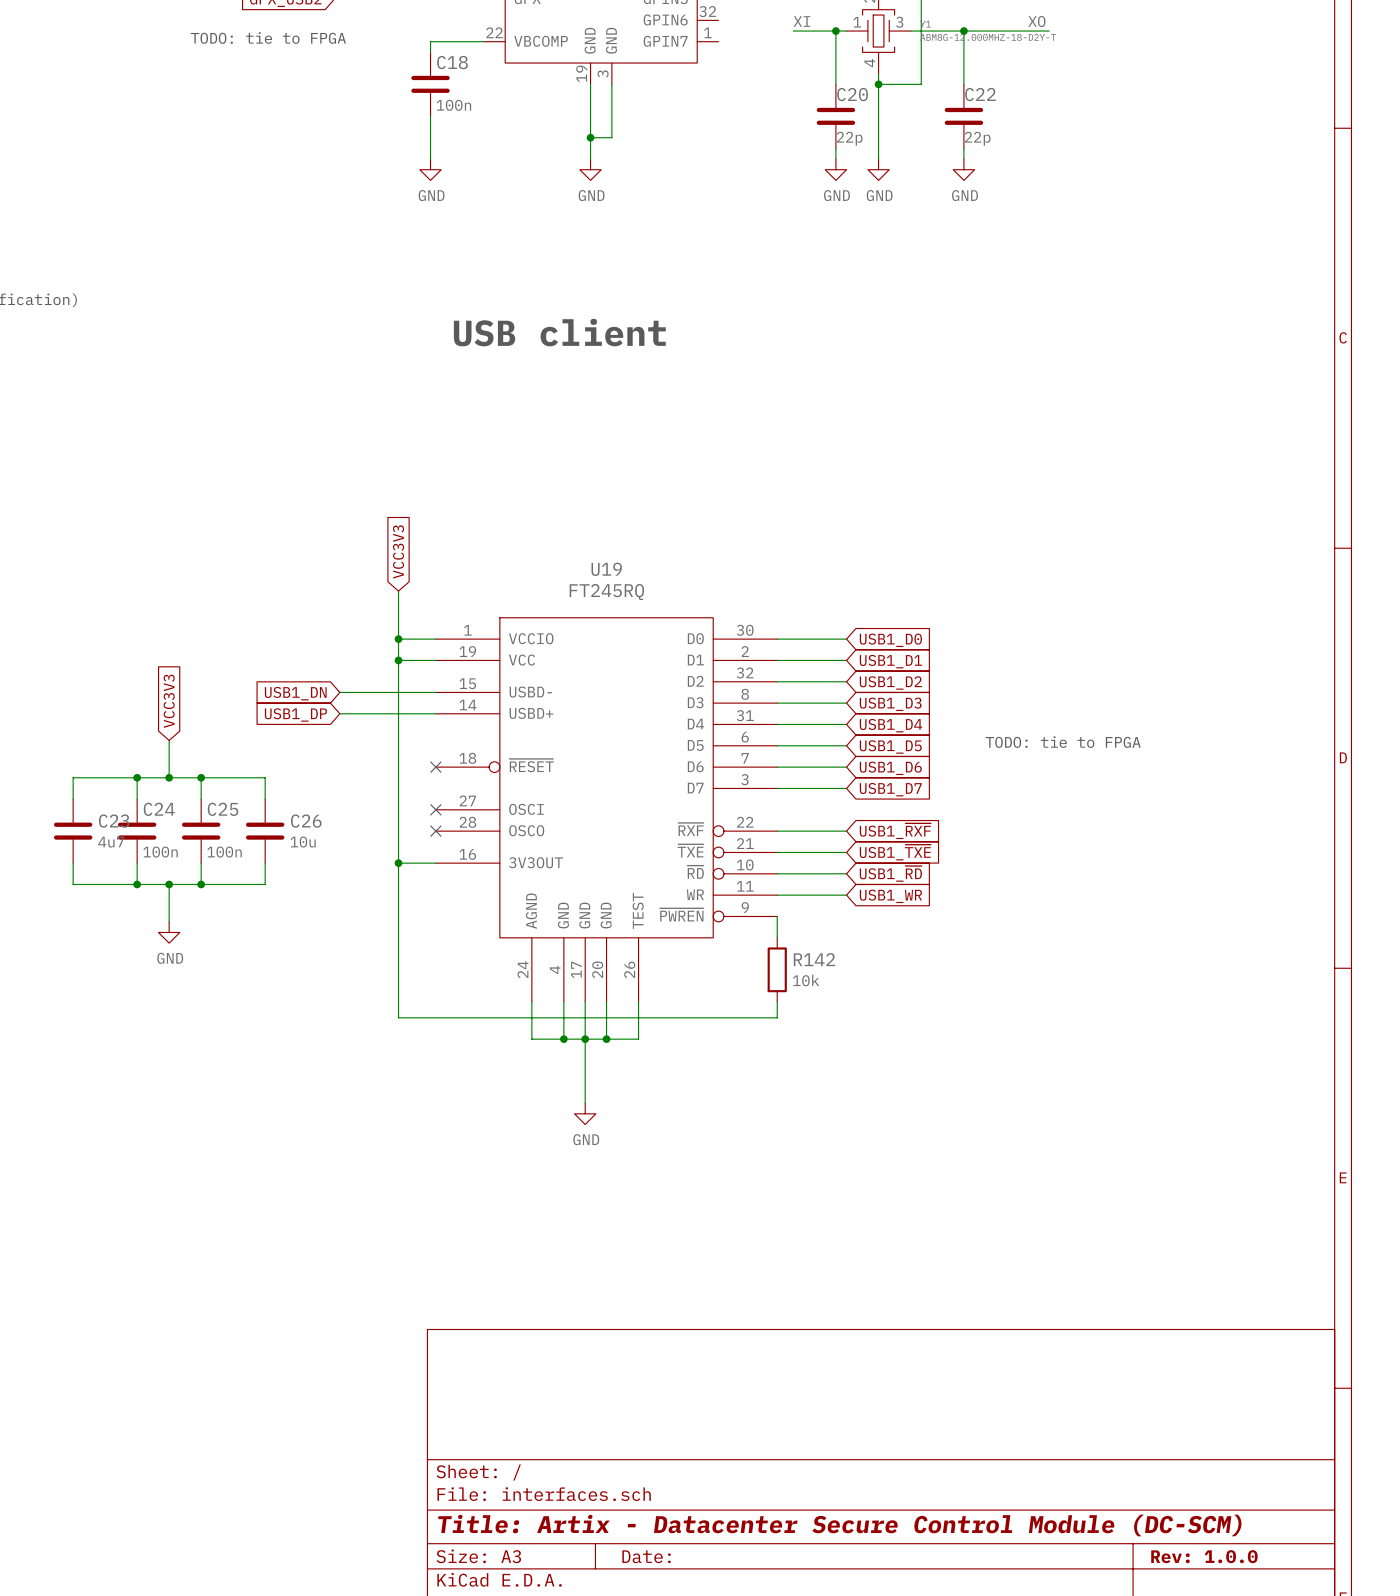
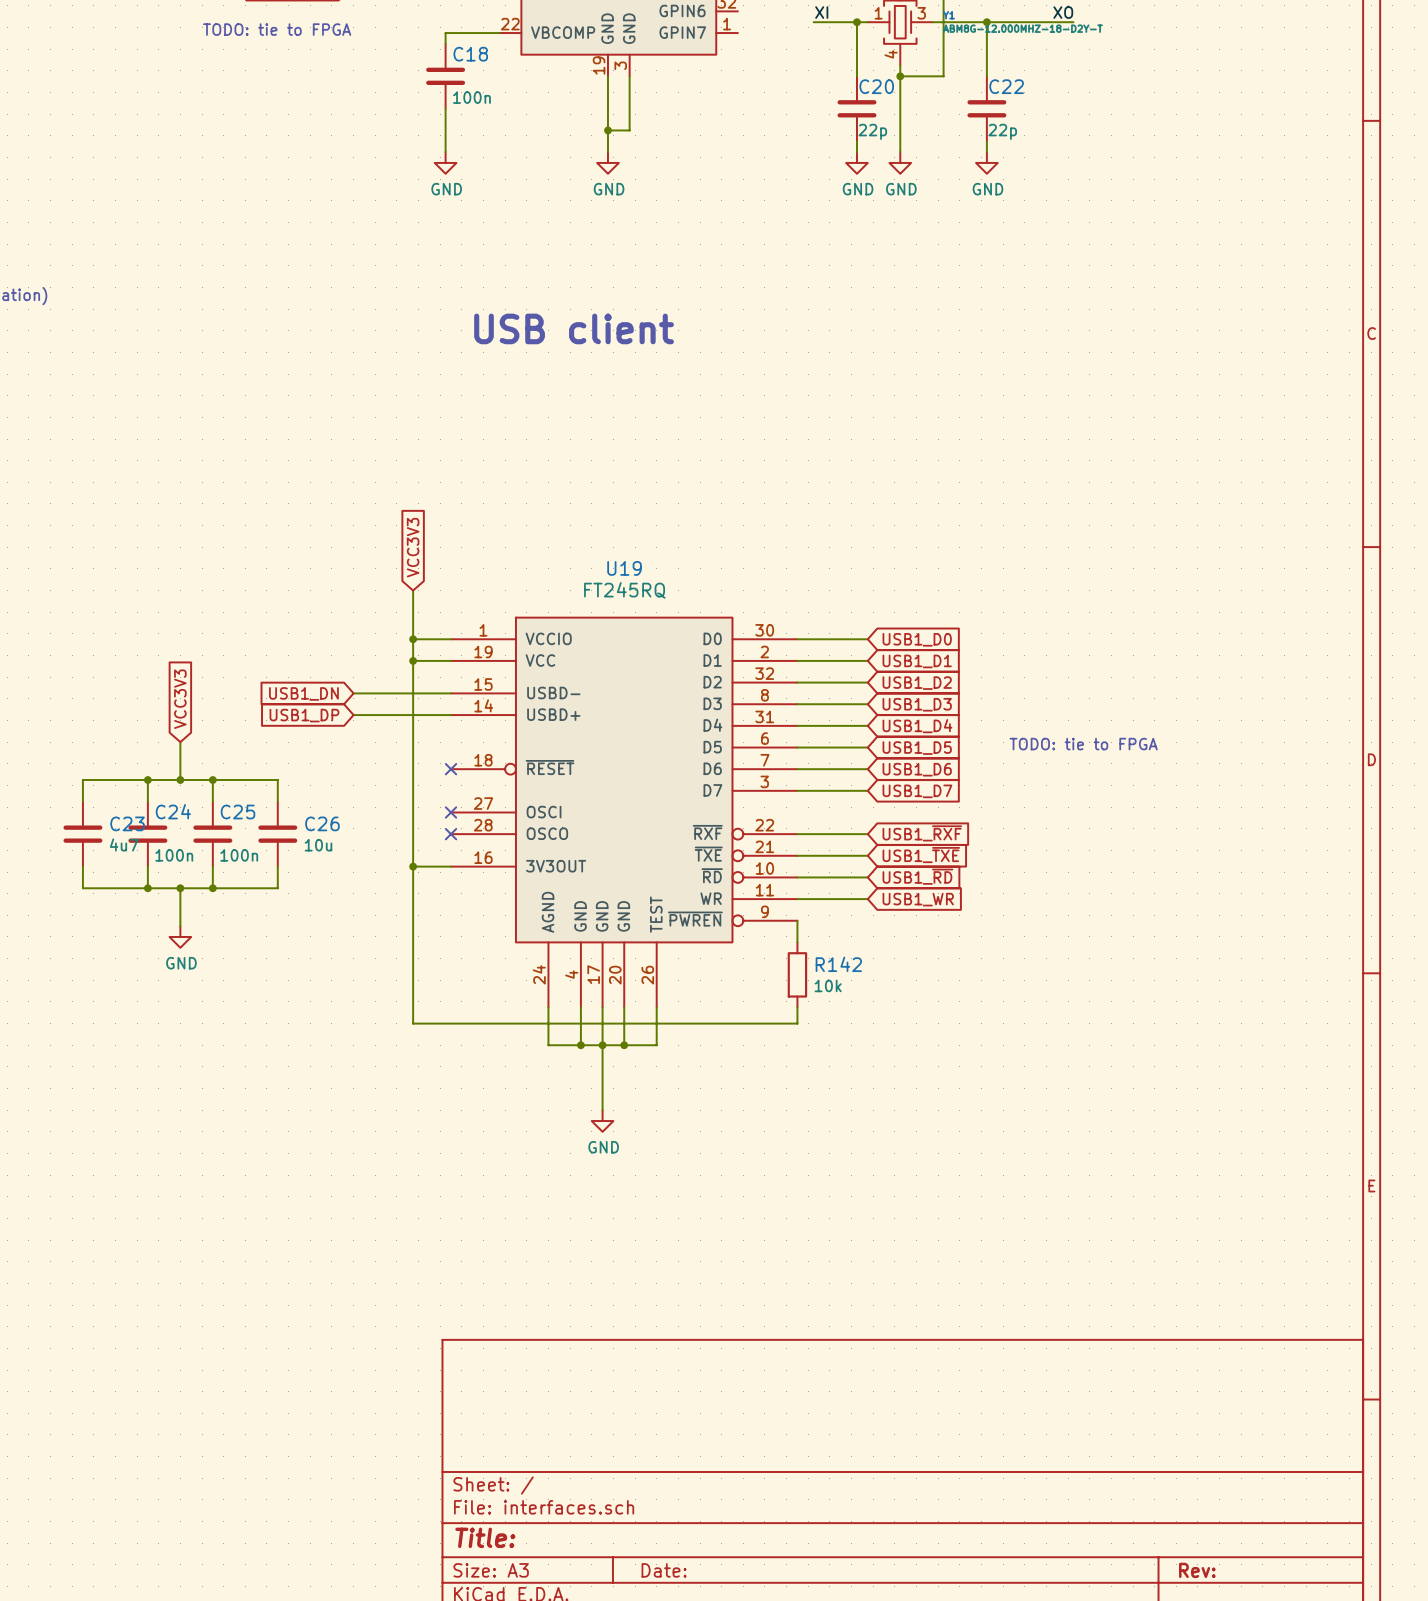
title block: Title: Artix - Datacenter Secure Control Module (DC-SCM) (839, 1525) -> Title: (485, 1537)
title block: Rev: 1.0.0 (1204, 1556) -> Rev: (1197, 1570)

